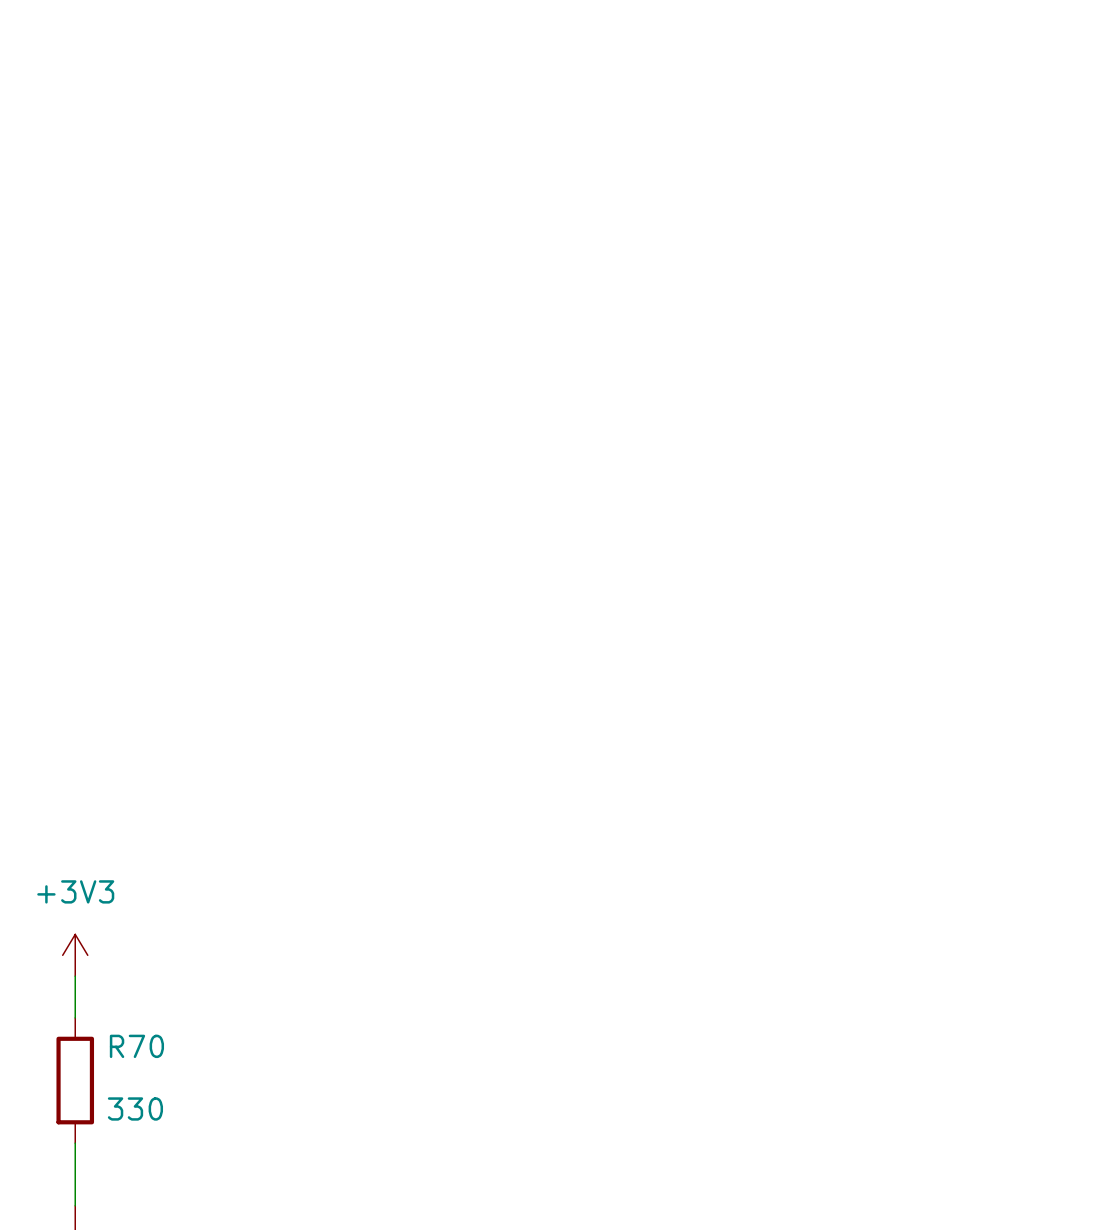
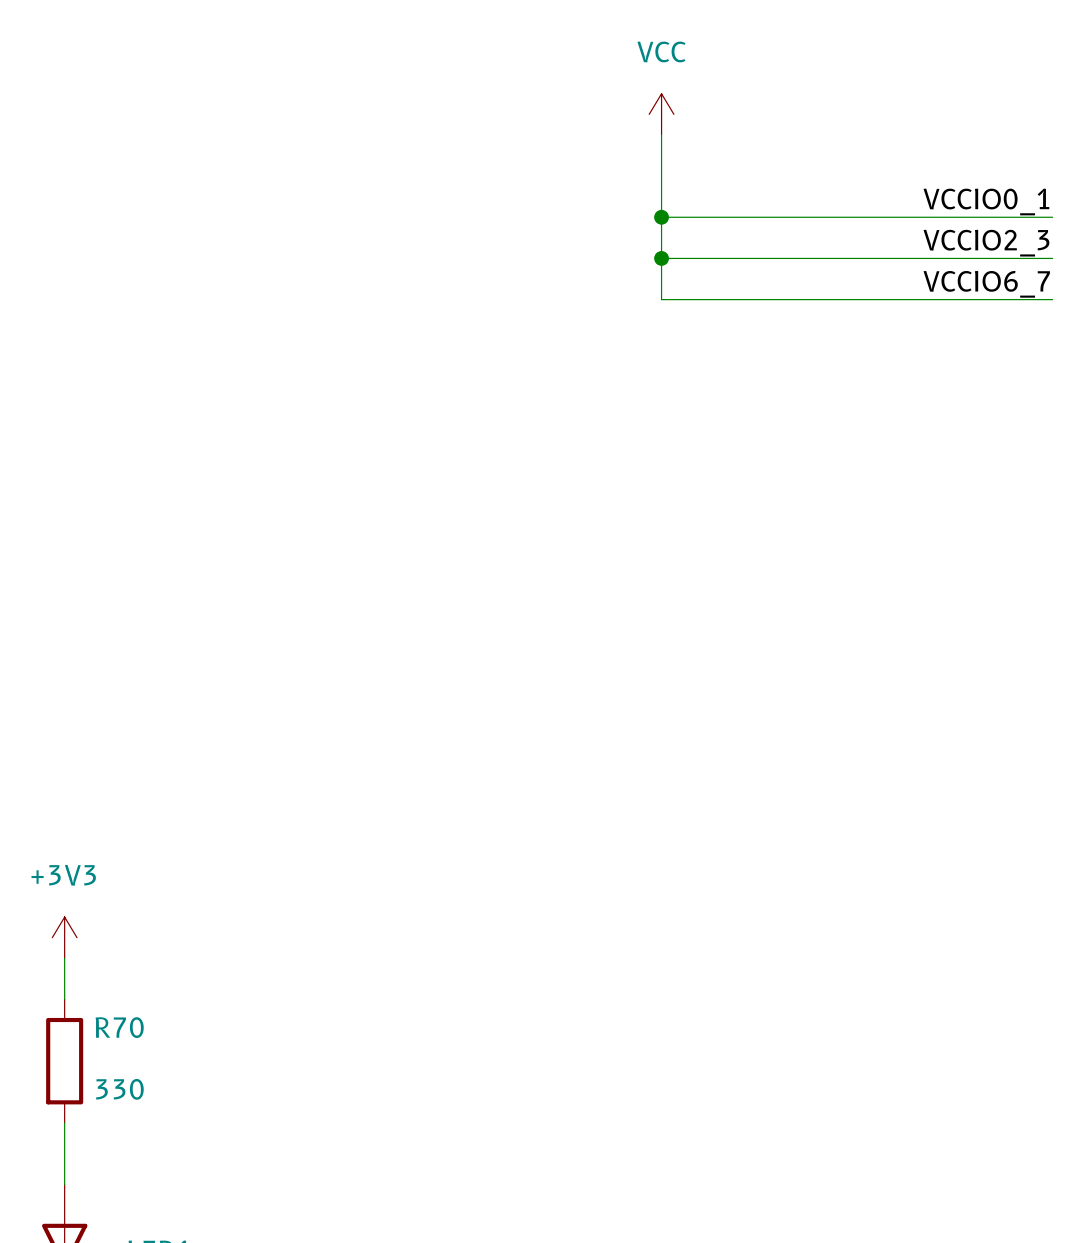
power symbol: none -> VCC (661, 114)
wire: none -> (661, 134) (661, 299) (1052, 299)
label: none -> VCCIO0_1 (986, 201)
wire: none -> (661, 217) (1052, 217)
junction: none -> (661, 217)
label: none -> VCCIO2_3 (986, 243)
wire: none -> (661, 258) (1052, 258)
junction: none -> (661, 258)
label: none -> VCCIO6_7 (986, 284)

